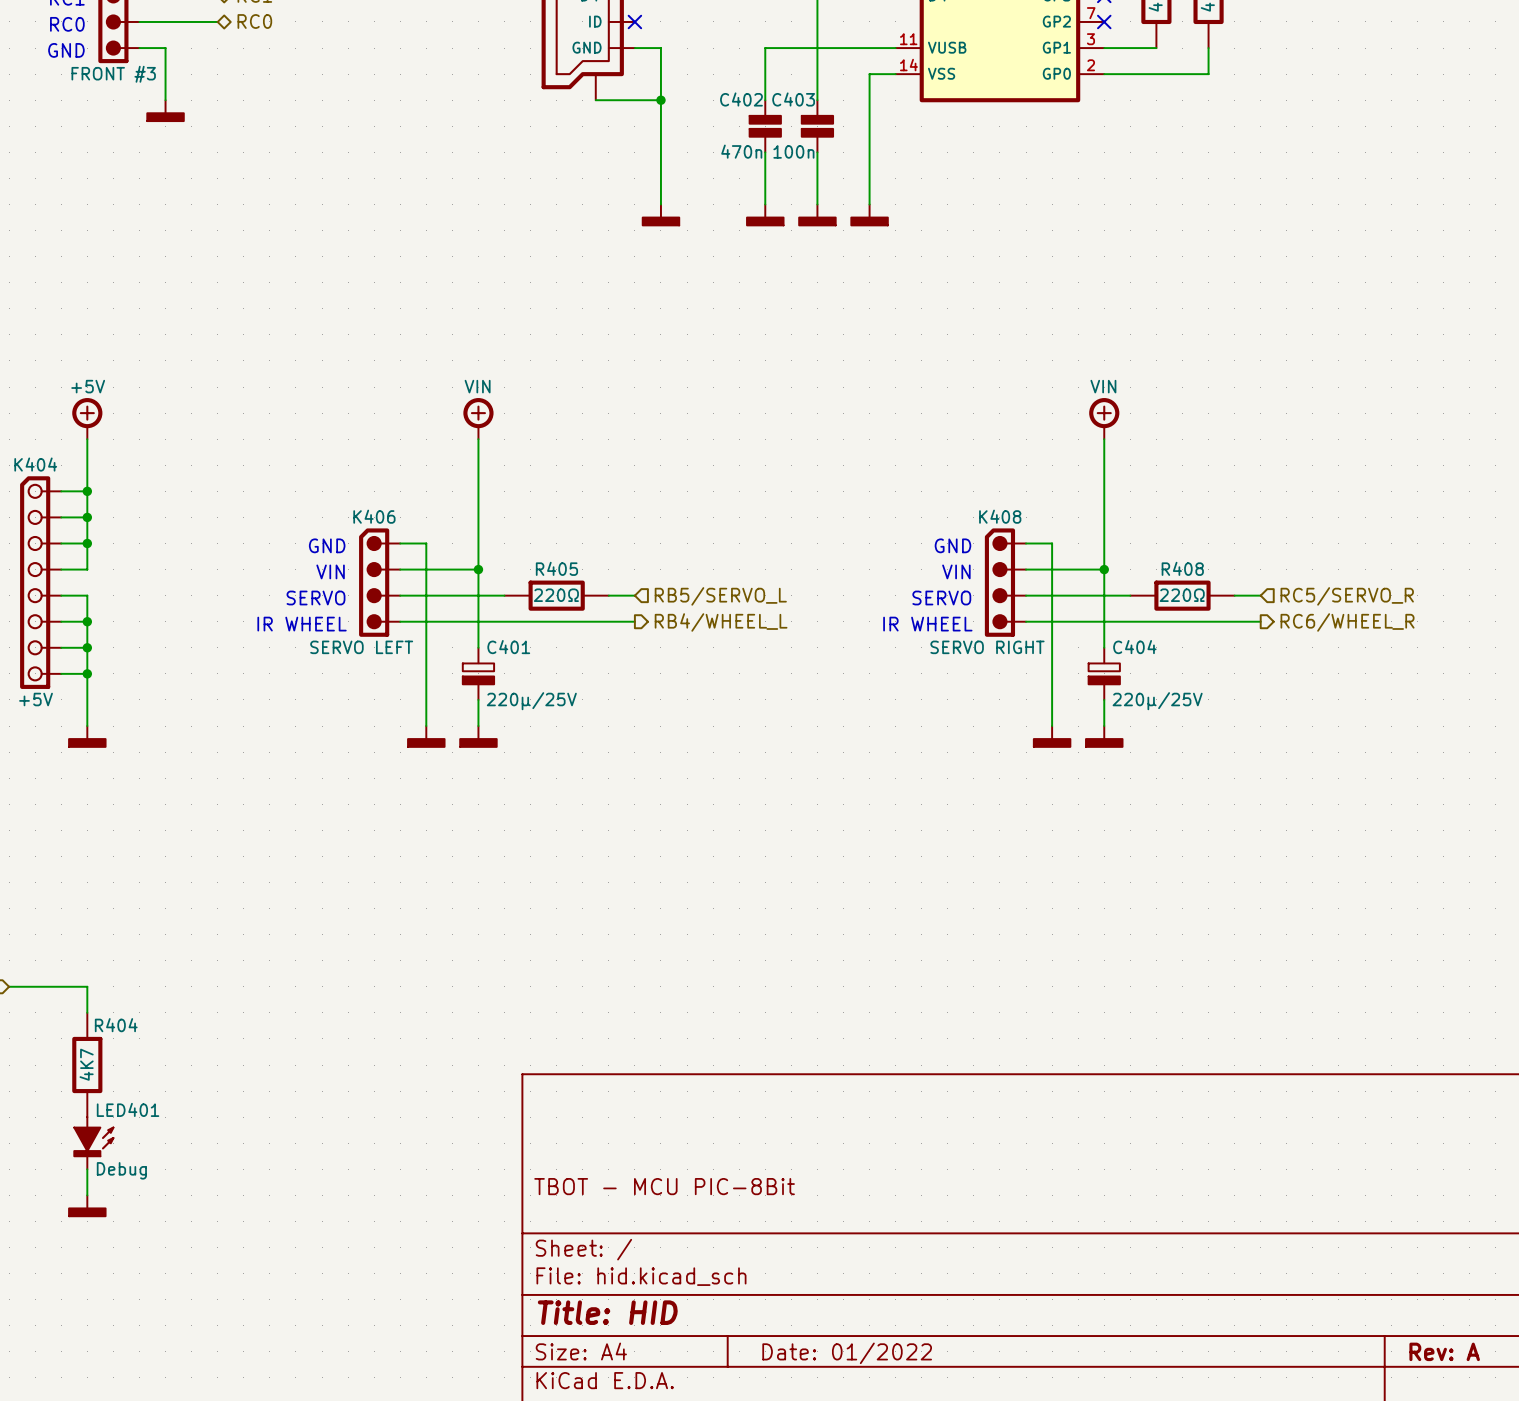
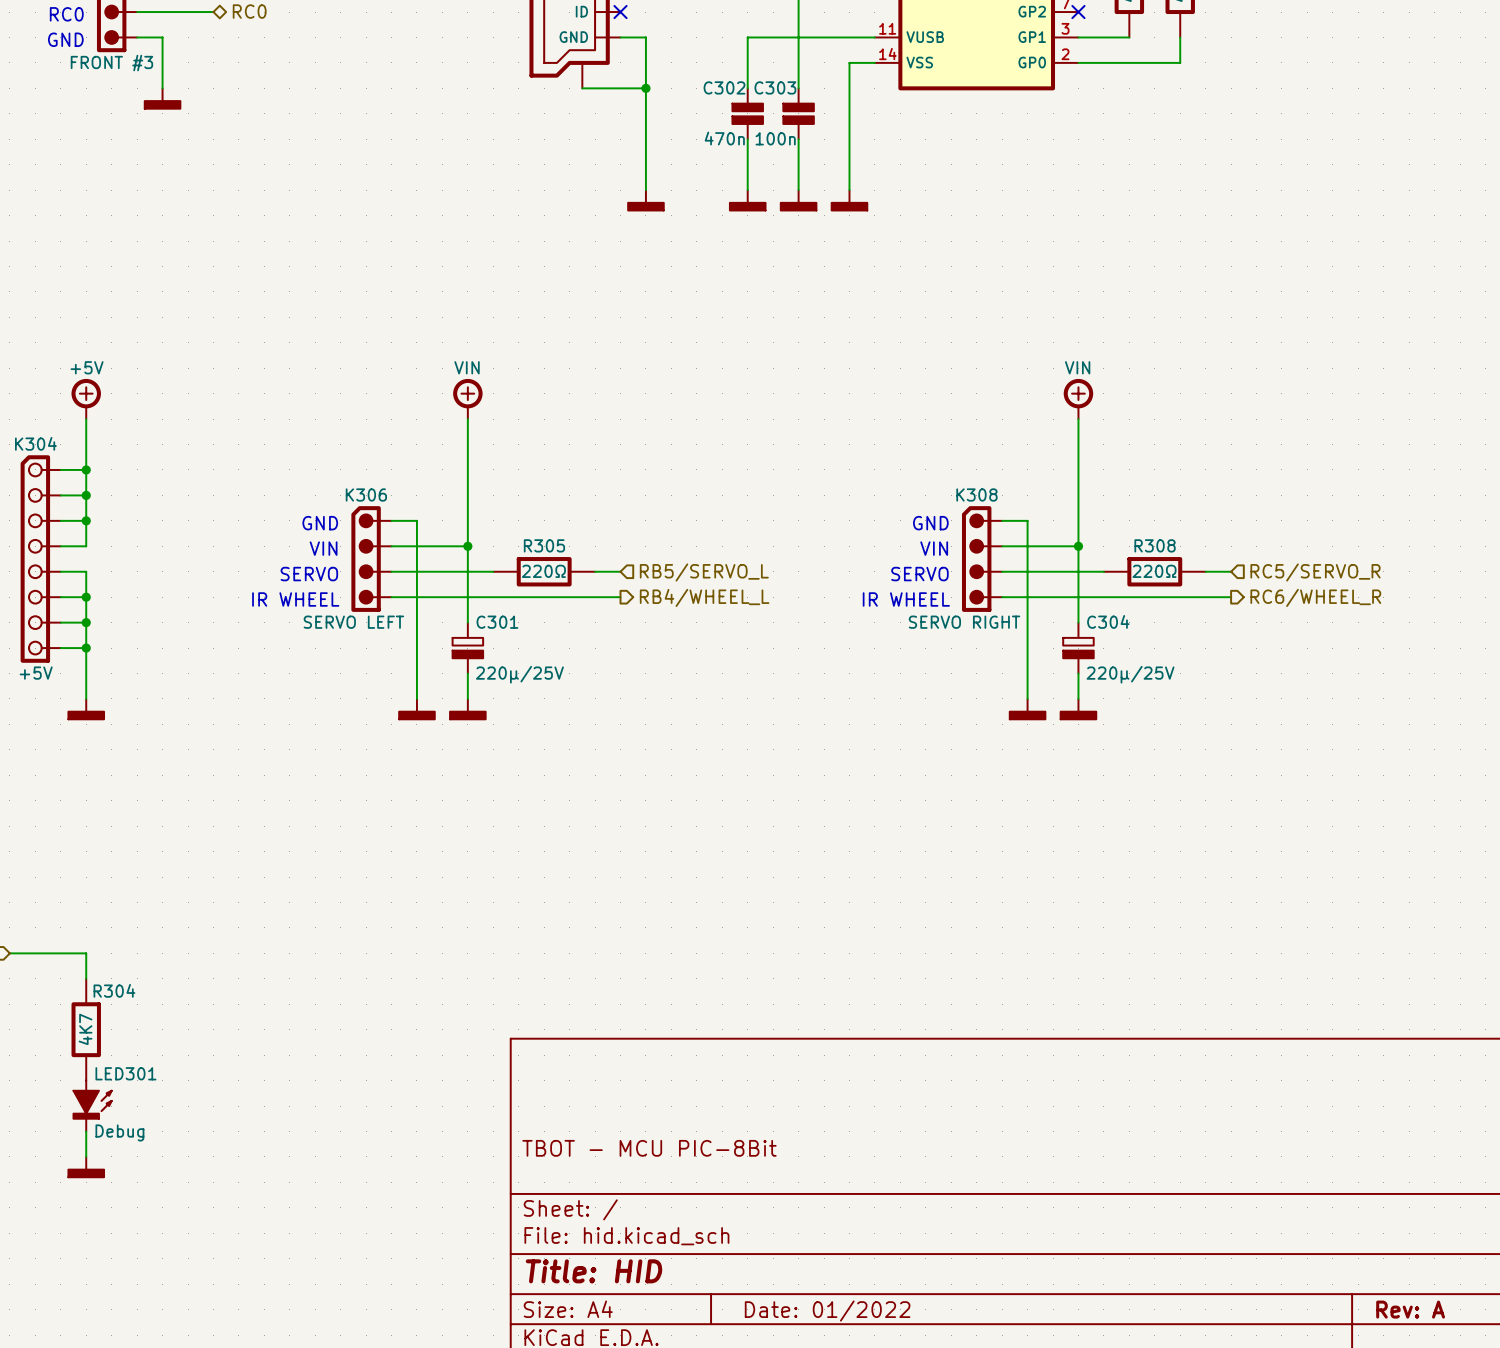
C402 name: C402 (741, 99) -> C302 (724, 87)
C403 name: C403 (793, 99) -> C303 (775, 87)
K404 name: K404 (35, 464) -> K304 (35, 443)
K406 name: K406 (374, 516) -> K306 (366, 494)
K408 name: K408 (1000, 516) -> K308 (976, 494)
R405 name: R405 (556, 568) -> R305 (544, 545)
R408 name: R408 (1182, 568) -> R308 (1155, 545)
C401 name: C401 (508, 647) -> C301 (497, 622)
C404 name: C404 (1134, 647) -> C304 (1108, 621)
R404 name: R404 (116, 1025) -> R304 (114, 990)
LED401 name: LED401 (128, 1109) -> LED301 (125, 1073)

